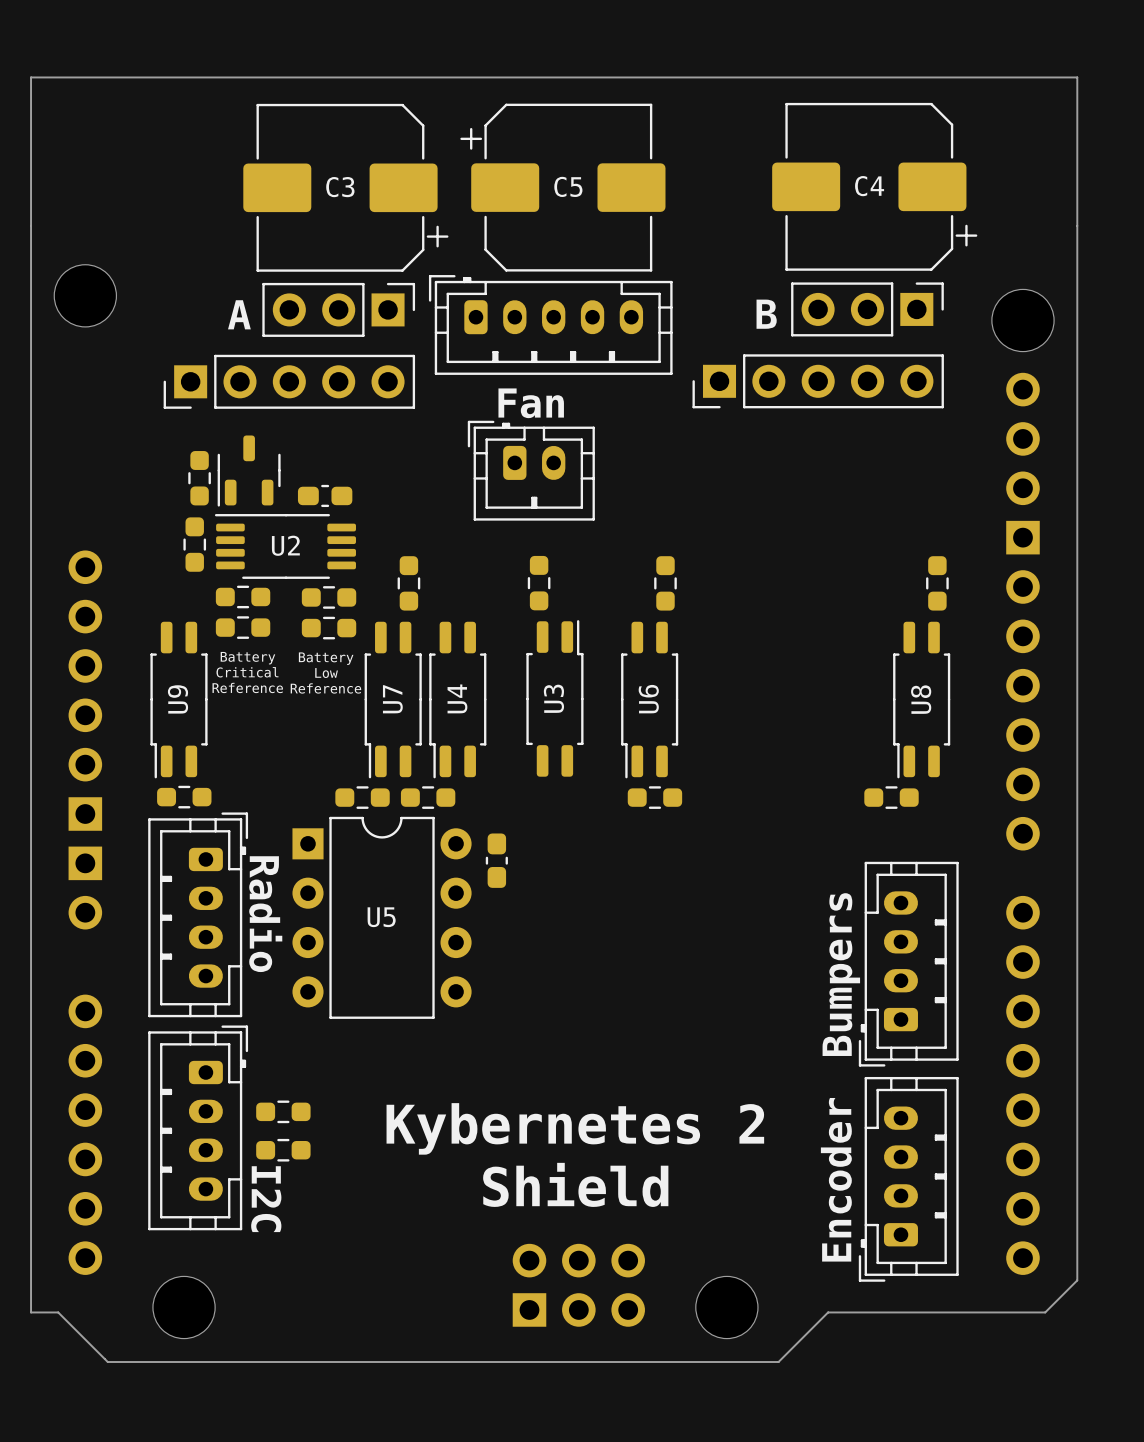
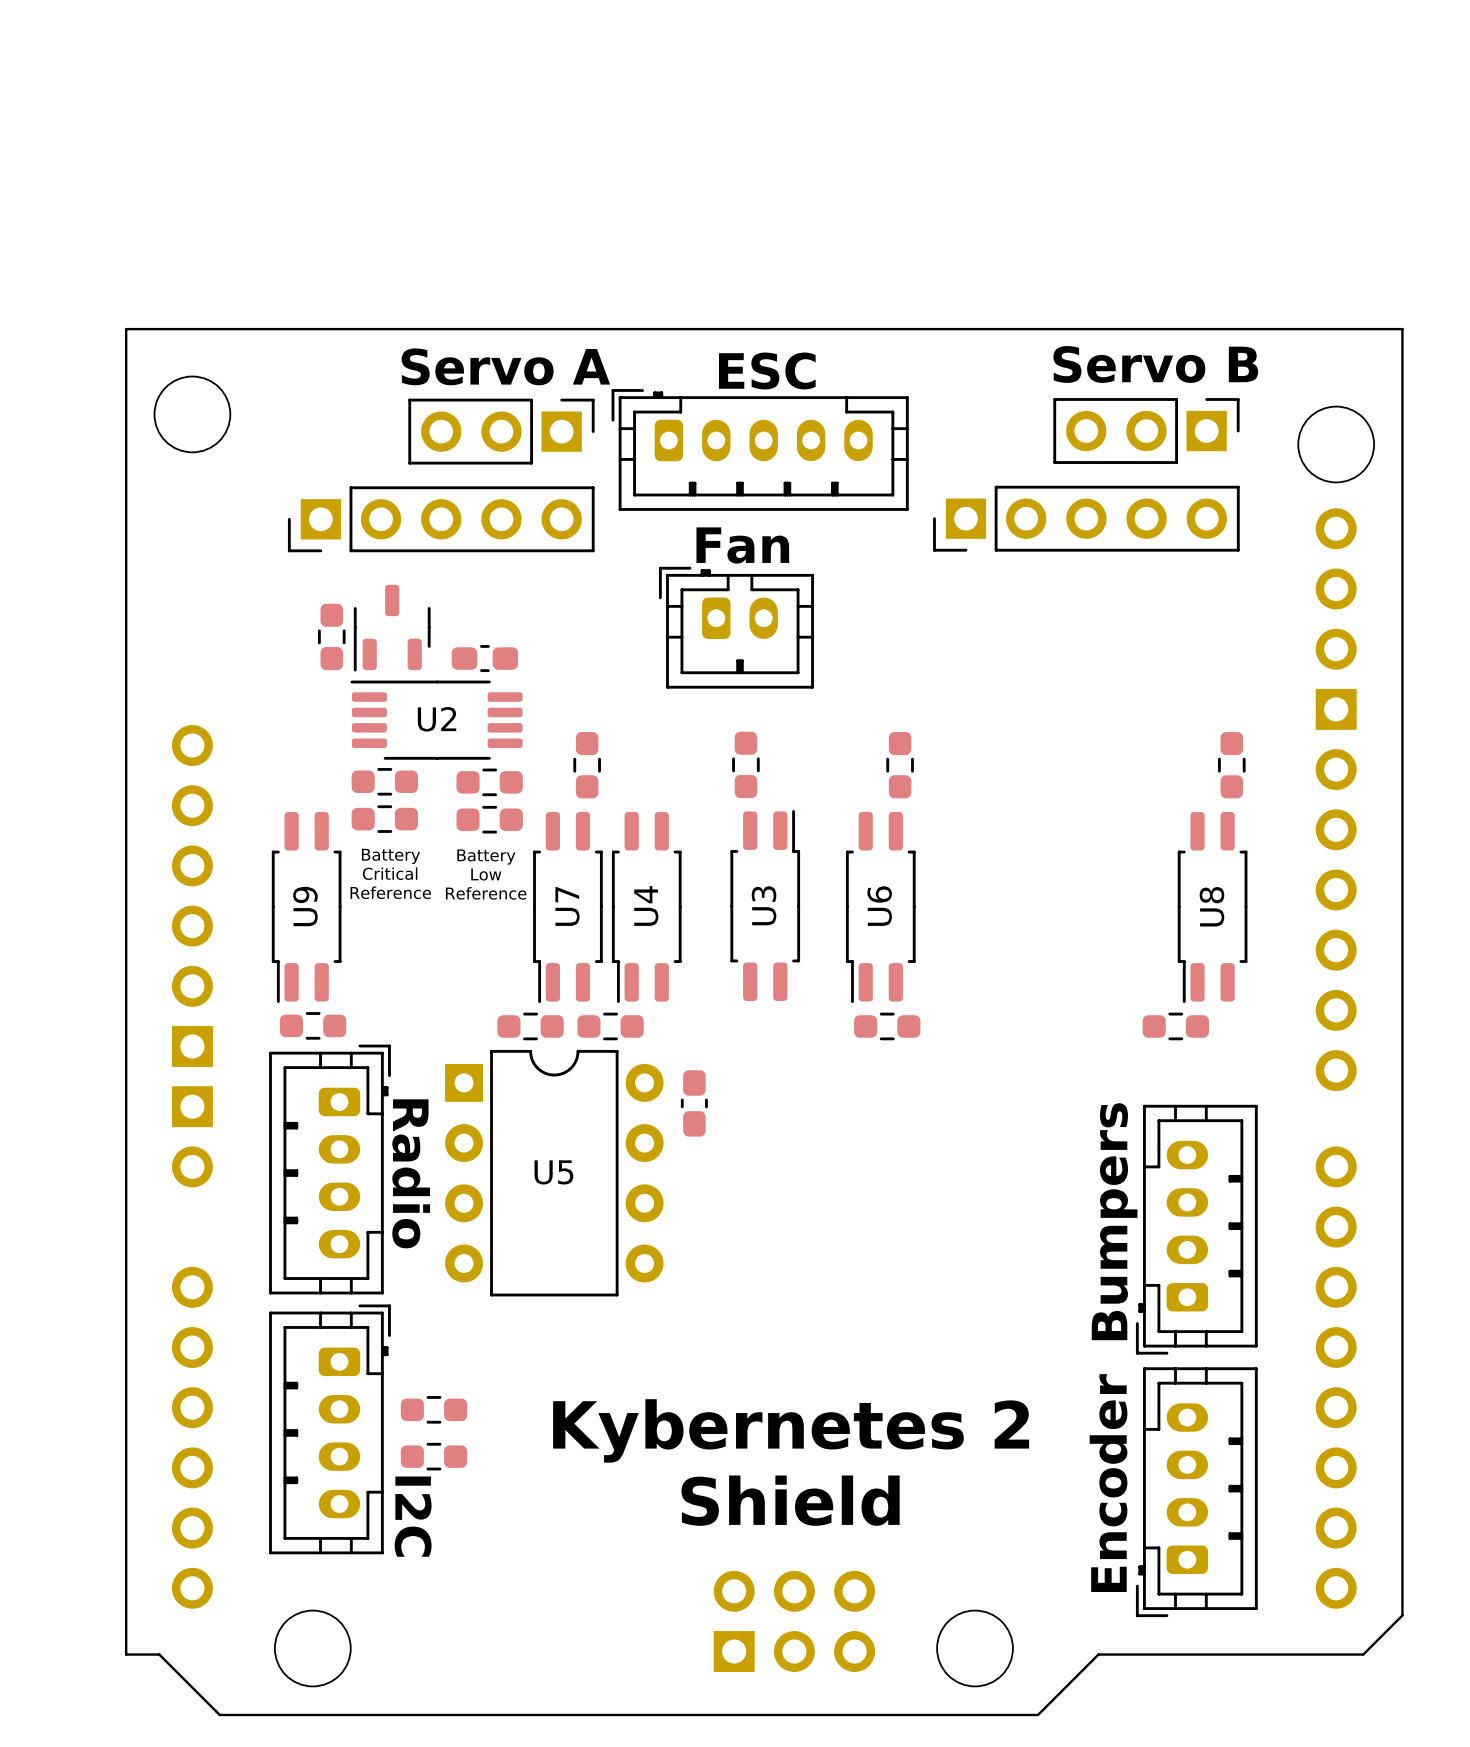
C4: (874, 186) -> none
C3: (345, 187) -> none
C5: (562, 187) -> none
board edge: (31, 225) (31, 77) (1077, 77) (1077, 225) -> (126, 329) (1402, 329)
text: none -> Servo B (1155, 364)
text: none -> Servo A (505, 366)
text: none -> ESC (767, 370)
text: A (239, 314) -> none
text: B (766, 314) -> none
part: (194, 544) -> none

